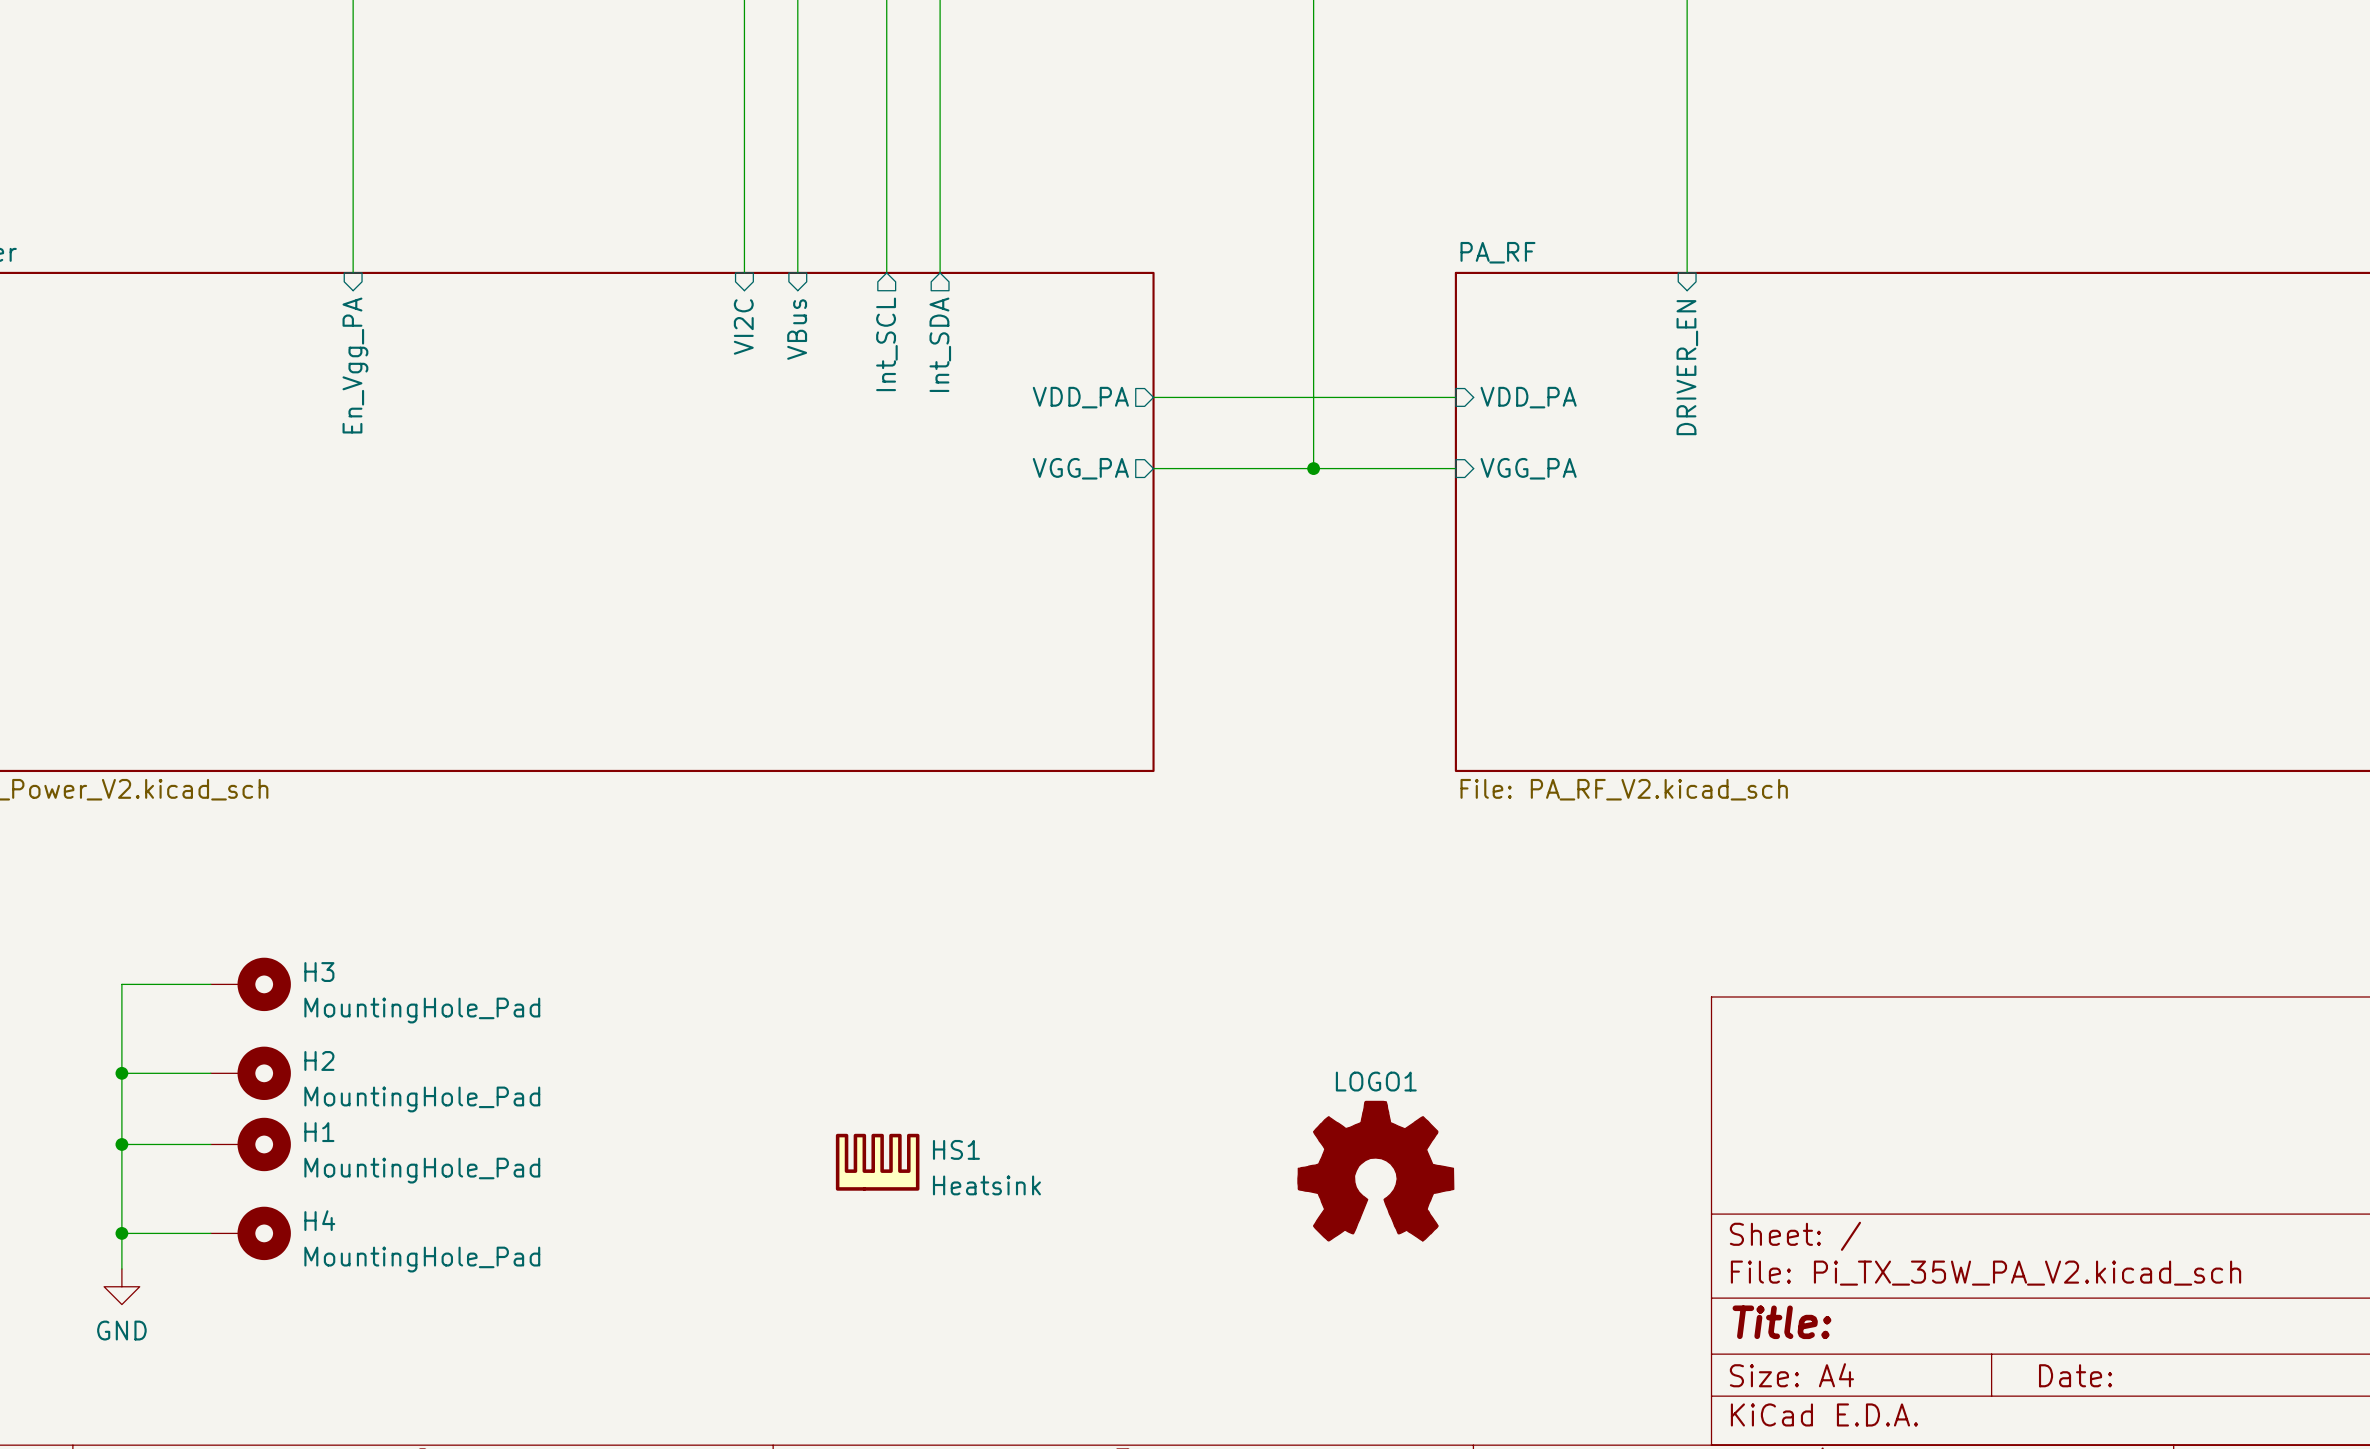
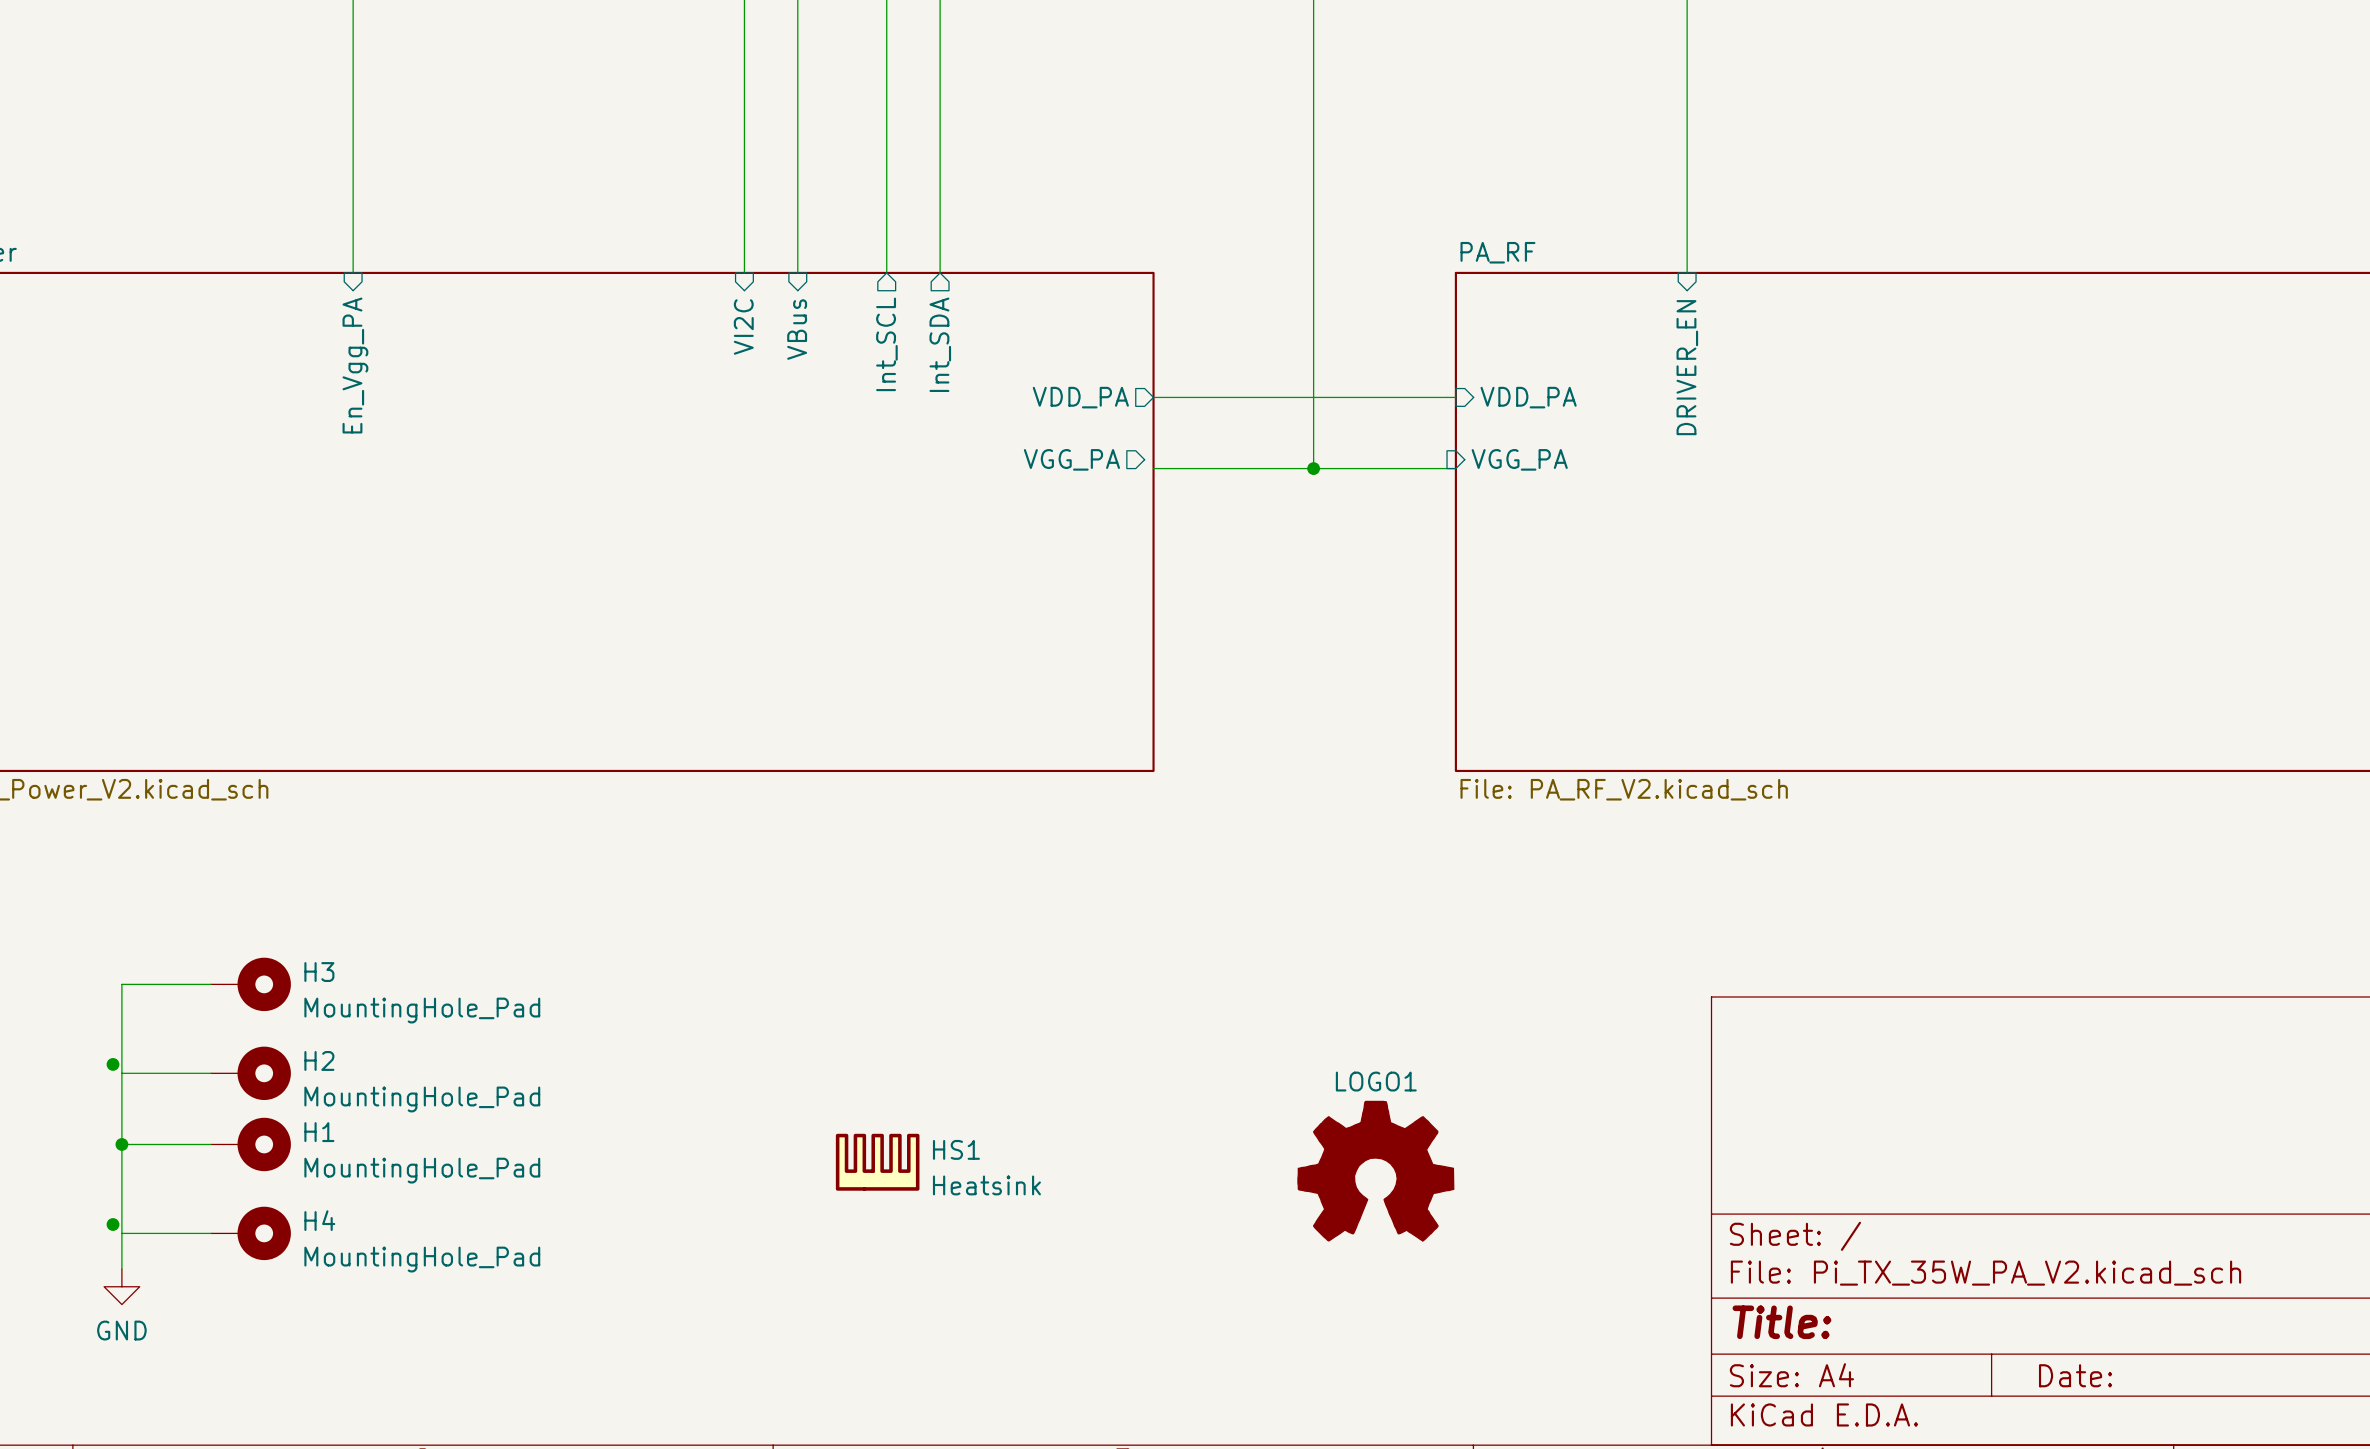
sheet pin position: VGG_PA (1080, 468) -> VGG_PA (1071, 459)
sheet pin position: VGG_PA (1528, 468) -> VGG_PA (1519, 459)
junction position: (121, 1073) -> (113, 1064)
junction position: (121, 1233) -> (113, 1224)

